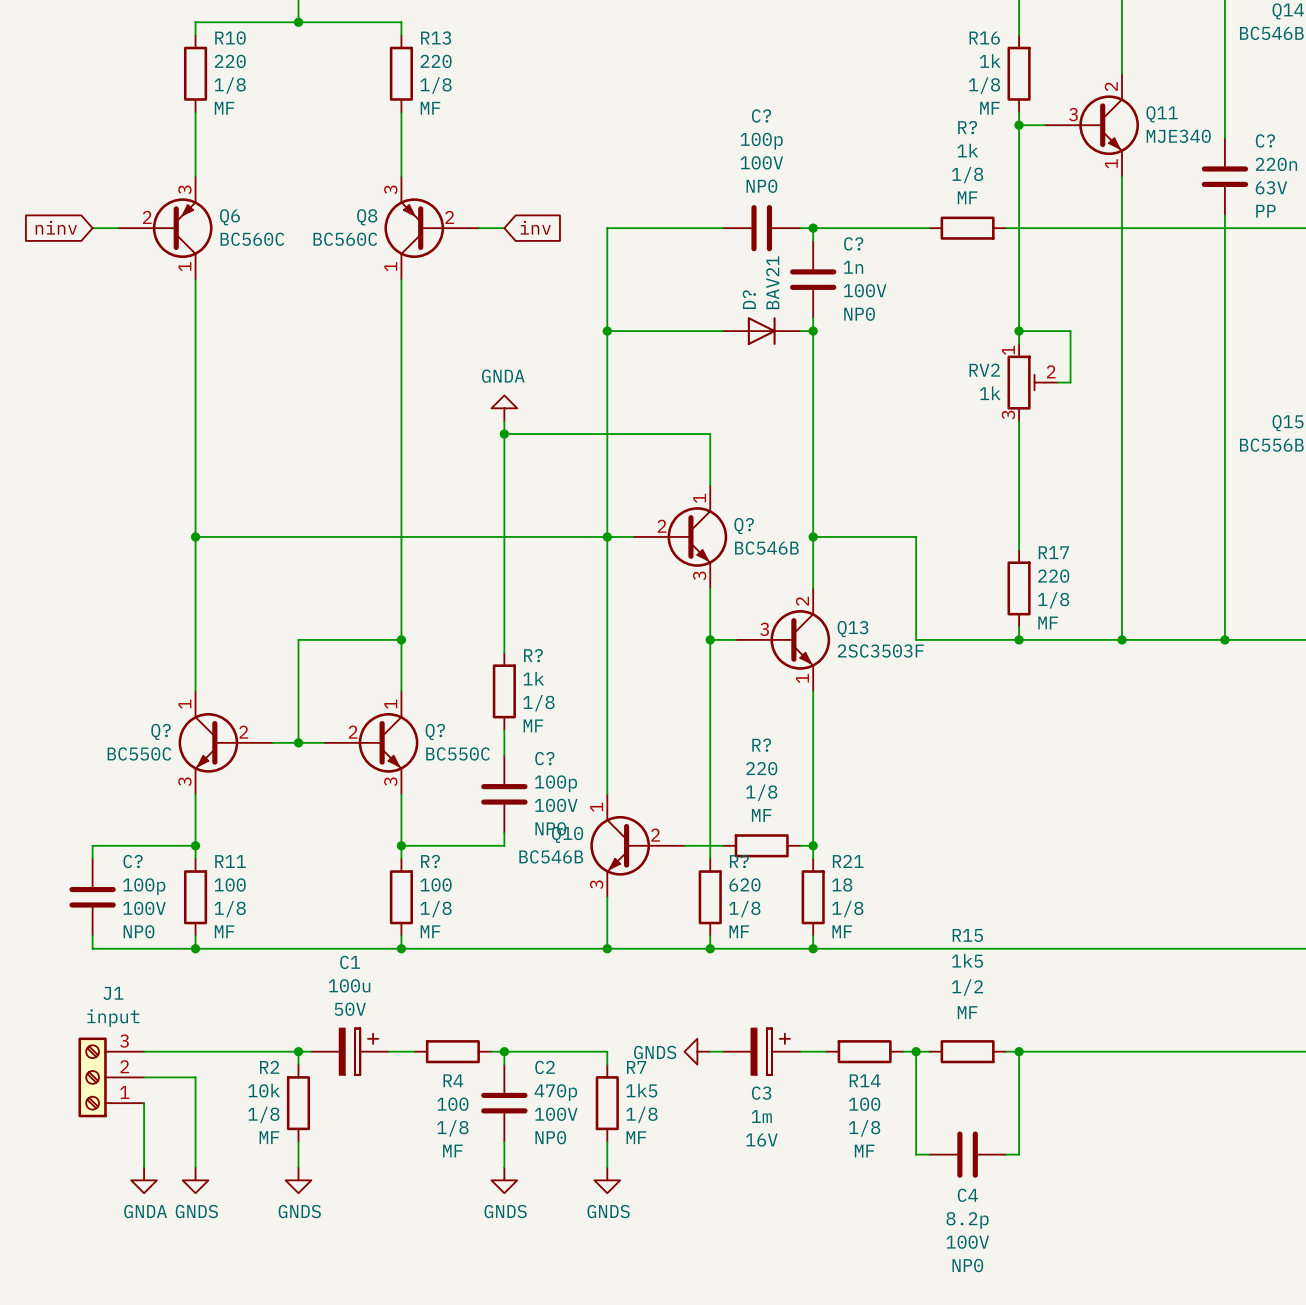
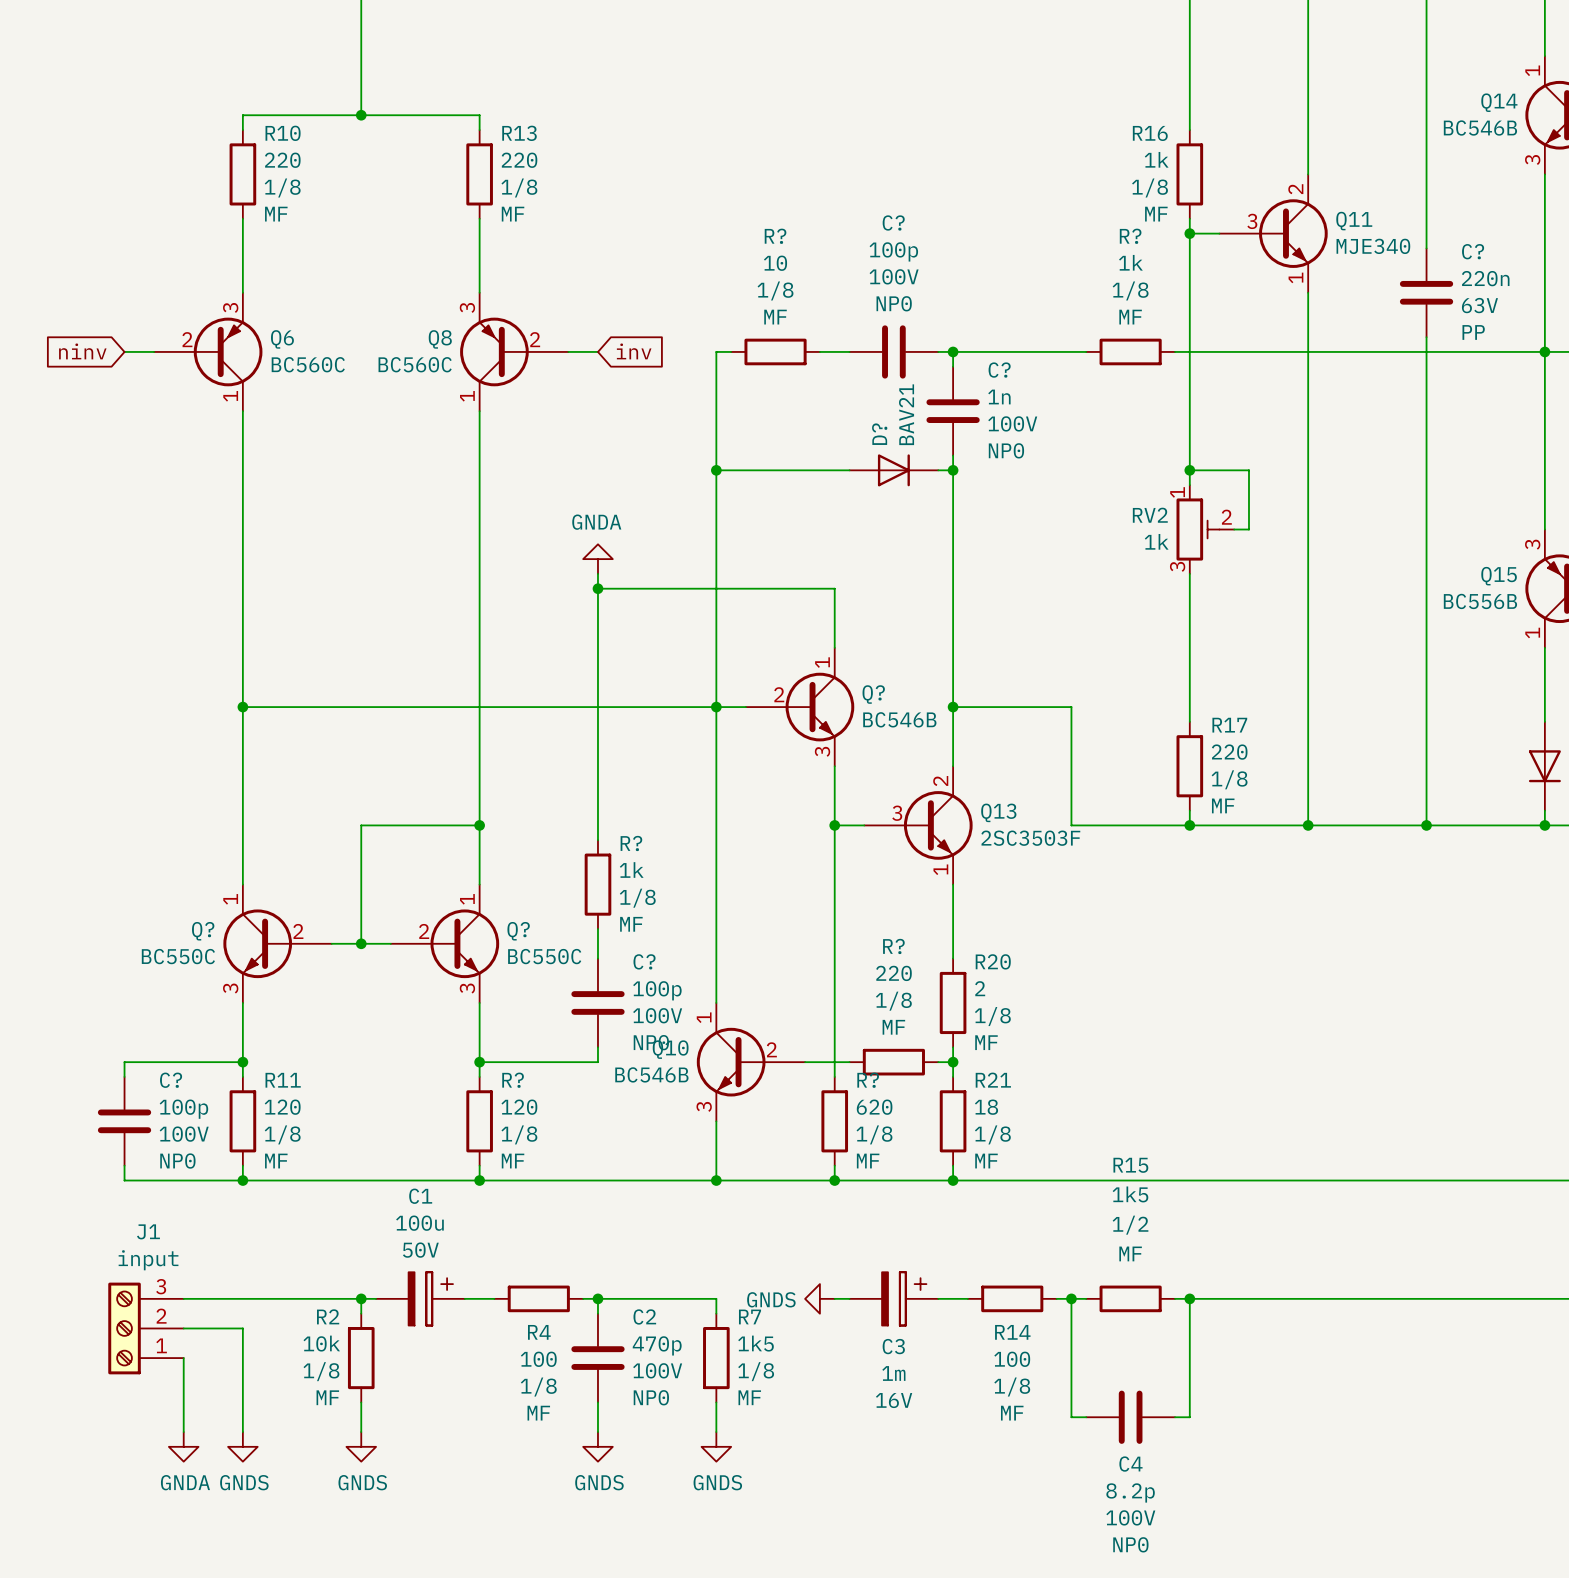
wire: (620, 228) (697, 228) -> none
R?: none -> 10 (775, 351)
wire: (813, 755) (813, 832) -> none
R20: none -> 2 (953, 1002)
R11 value: 100 (230, 884) -> 120 (282, 1107)
R? value: 100 (436, 884) -> 120 (519, 1107)

